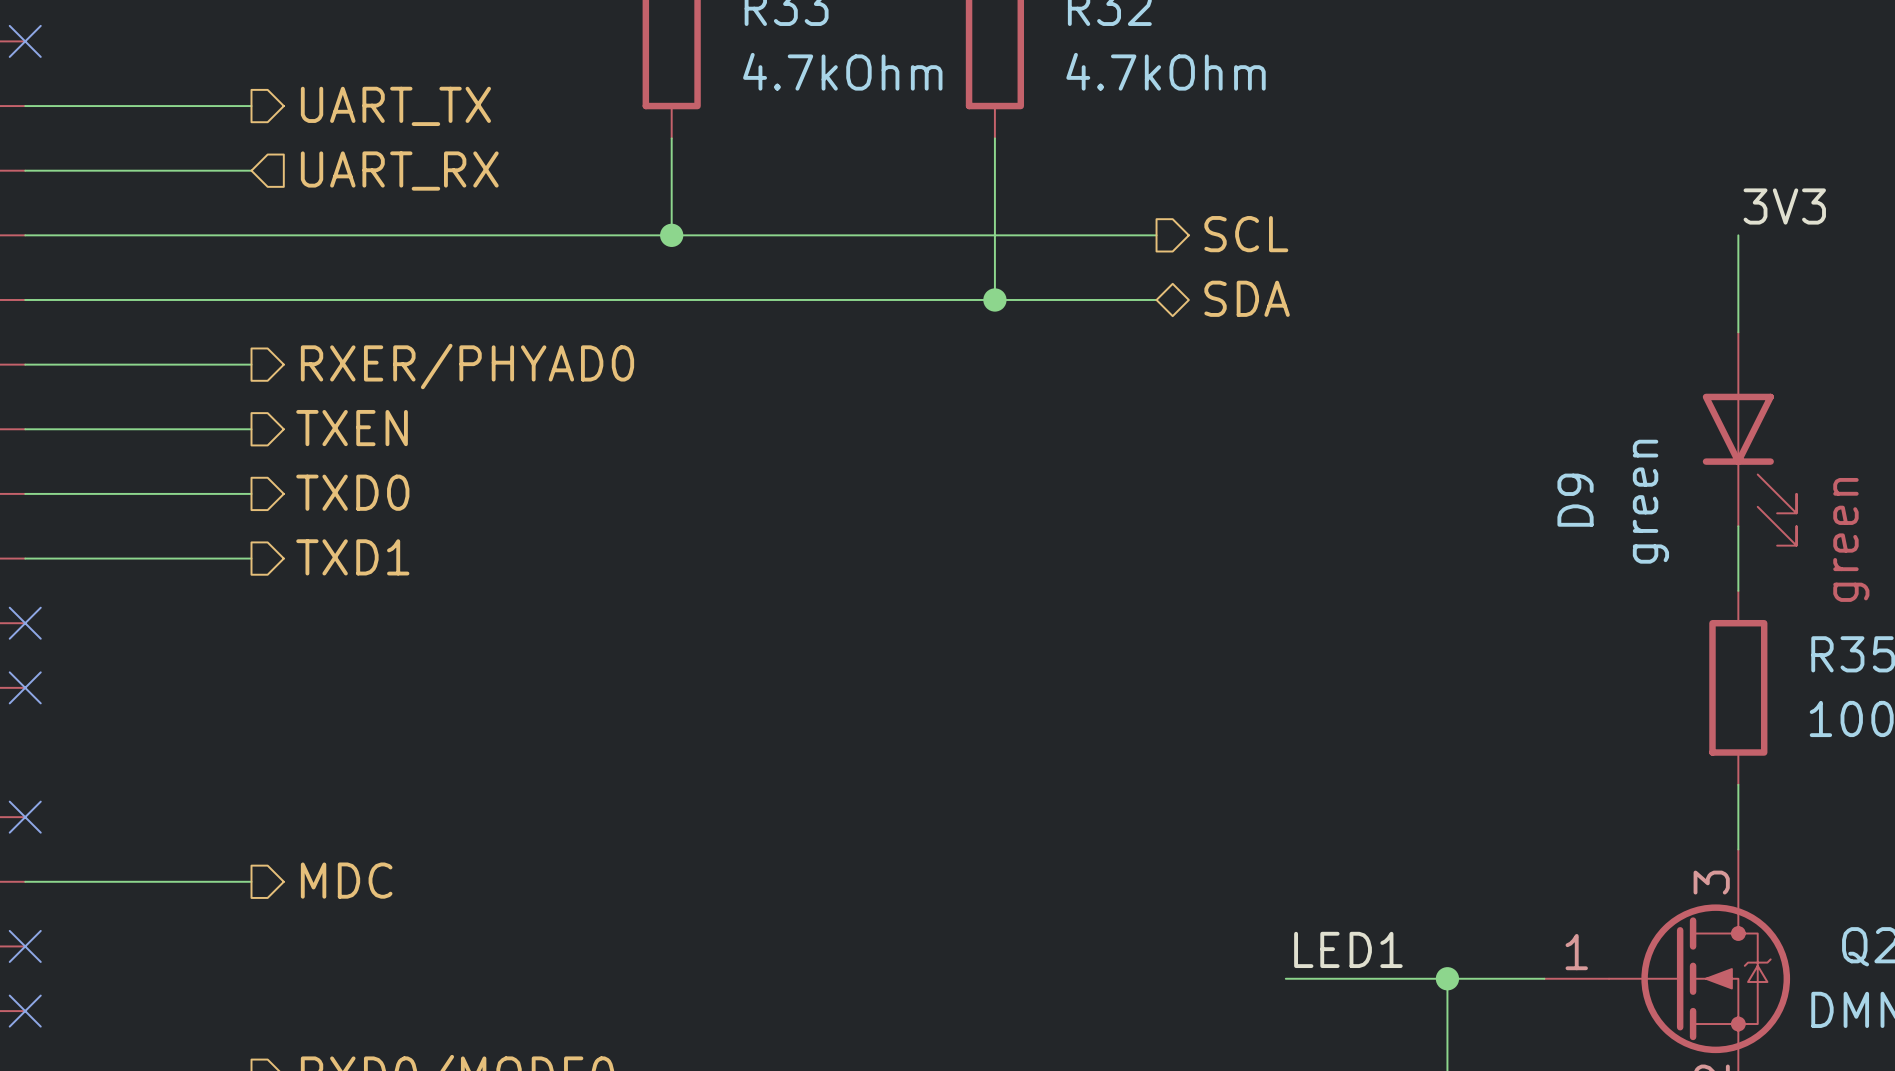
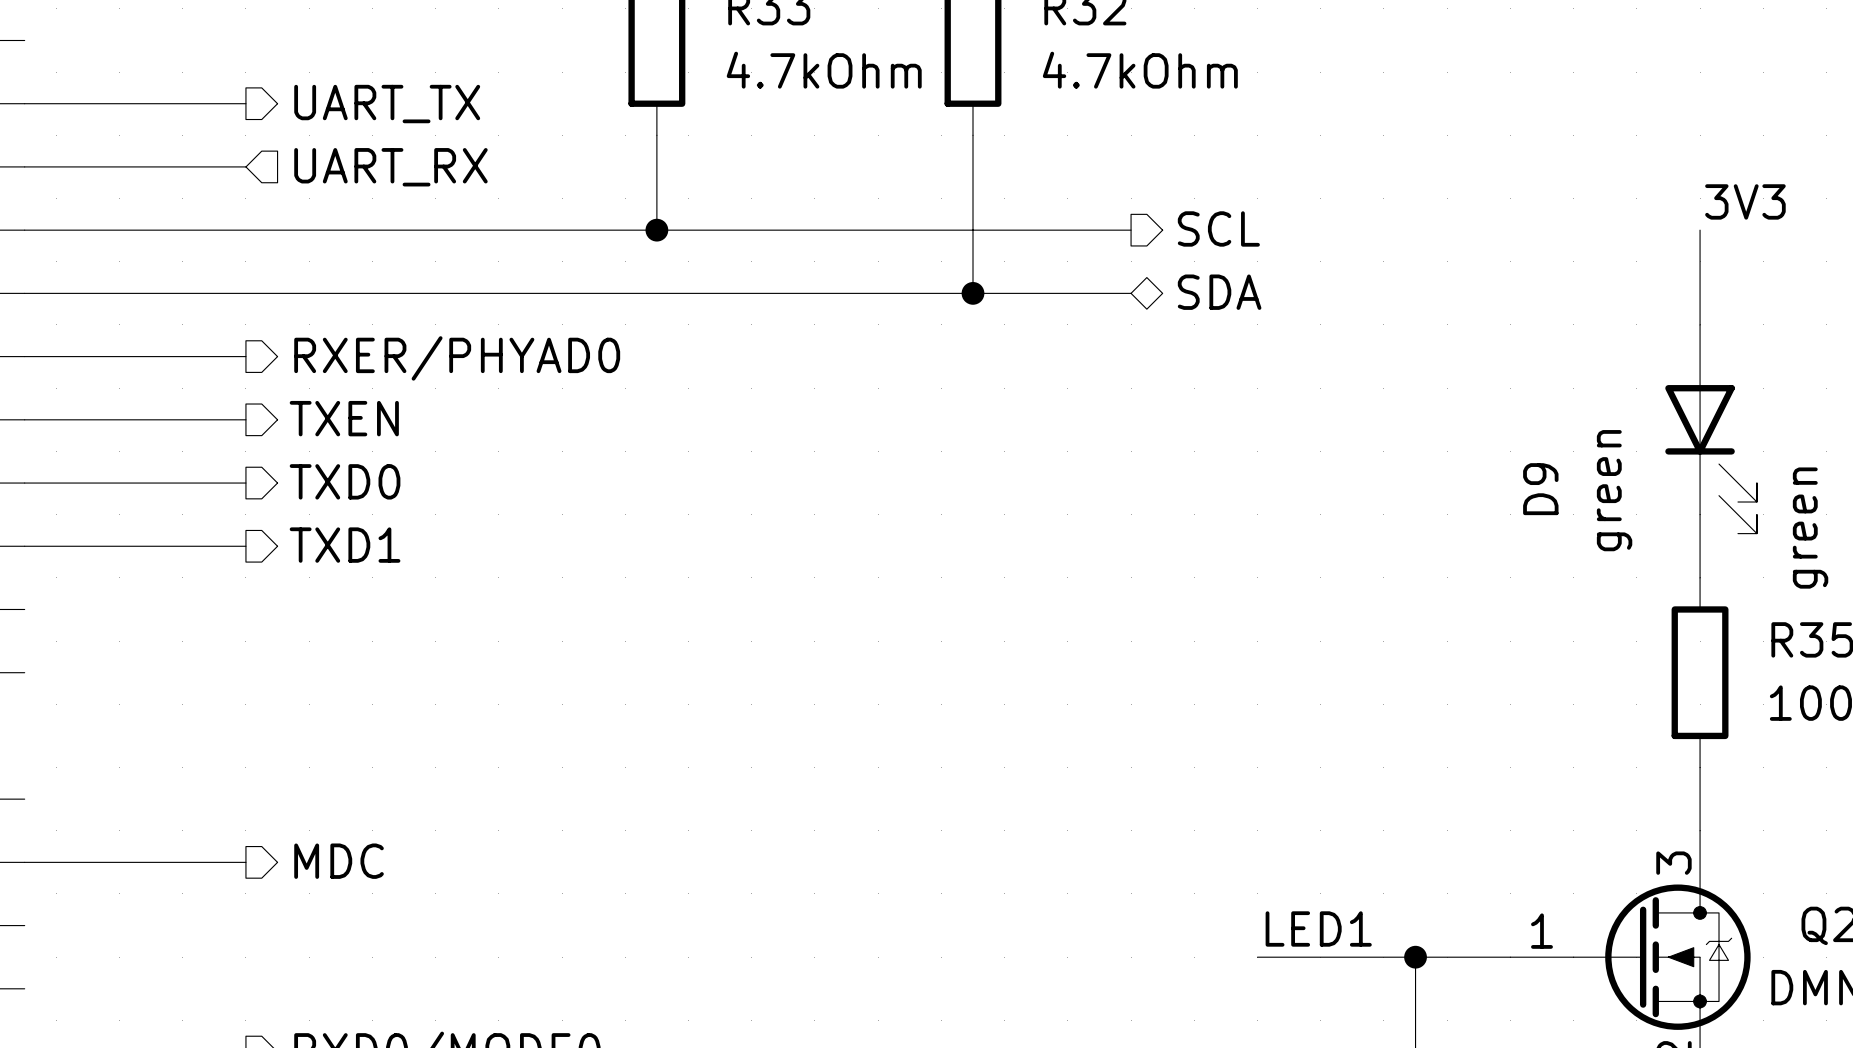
no-connect mark: (25, 41) -> none
no-connect mark: (25, 623) -> none
no-connect mark: (25, 687) -> none
no-connect mark: (25, 817) -> none
no-connect mark: (25, 946) -> none
no-connect mark: (25, 1011) -> none

